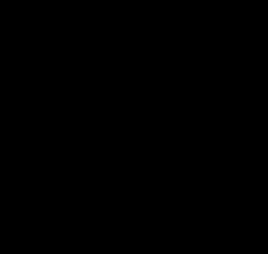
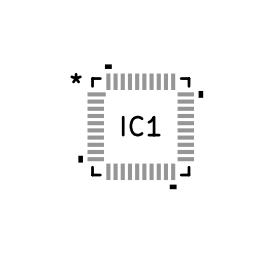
IC1: none -> (140, 126)

